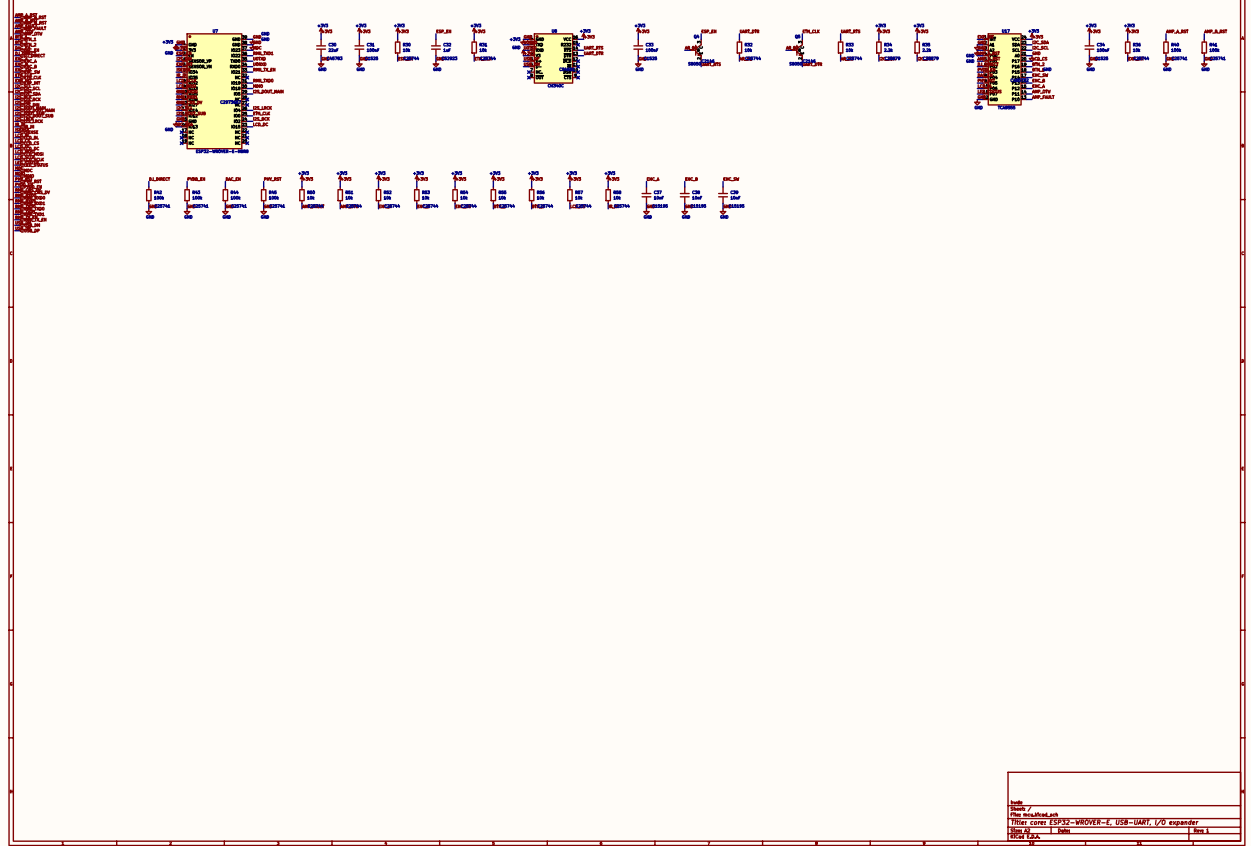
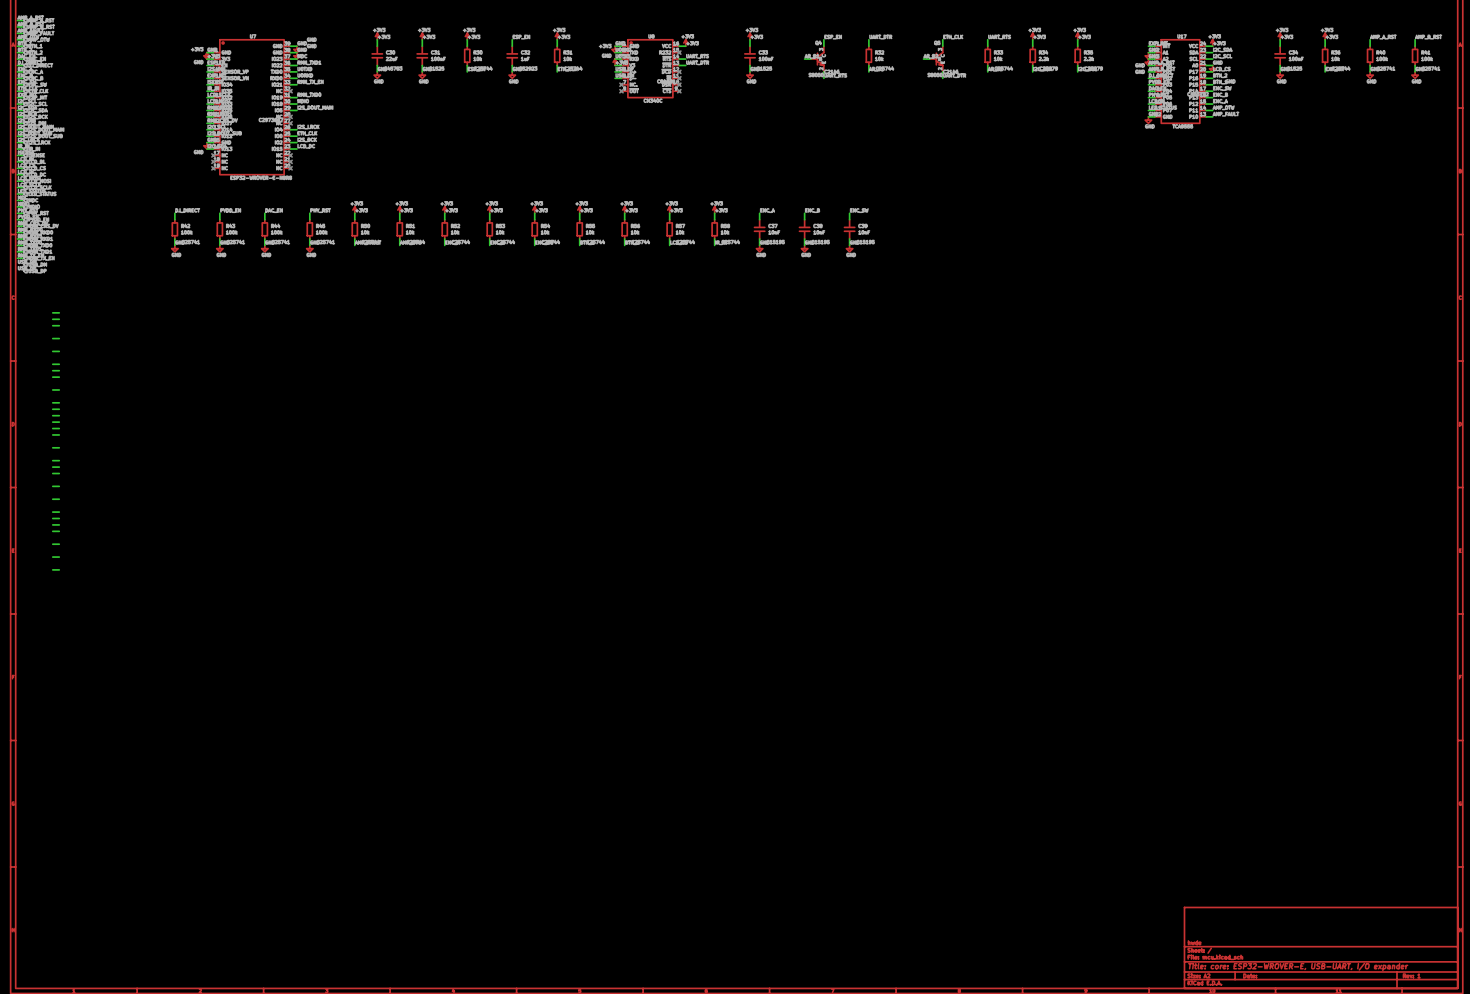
wire: (14, 225) (20, 225) -> (52, 312) (59, 312)
wire: (14, 230) (20, 230) -> (52, 319) (59, 319)
wire: none -> (52, 325) (59, 325)
wire: none -> (52, 338) (59, 338)
wire: none -> (52, 351) (59, 351)
wire: none -> (52, 364) (59, 364)
wire: none -> (52, 370) (59, 370)
wire: none -> (52, 377) (59, 377)
wire: none -> (52, 389) (59, 389)
wire: none -> (52, 402) (59, 402)
wire: none -> (52, 409) (59, 409)
wire: none -> (52, 415) (59, 415)
wire: none -> (52, 422) (59, 422)
wire: none -> (52, 428) (59, 428)
wire: none -> (52, 434) (59, 434)
wire: none -> (52, 447) (59, 447)
wire: none -> (52, 460) (59, 460)
wire: none -> (52, 467) (59, 467)
wire: none -> (52, 473) (59, 473)
wire: none -> (52, 486) (59, 486)
wire: none -> (52, 499) (59, 499)
wire: none -> (52, 512) (59, 512)
wire: none -> (52, 518) (59, 518)
wire: none -> (52, 524) (59, 524)
wire: none -> (52, 531) (59, 531)
wire: none -> (52, 544) (59, 544)
wire: none -> (52, 557) (59, 557)
wire: none -> (52, 569) (59, 569)

